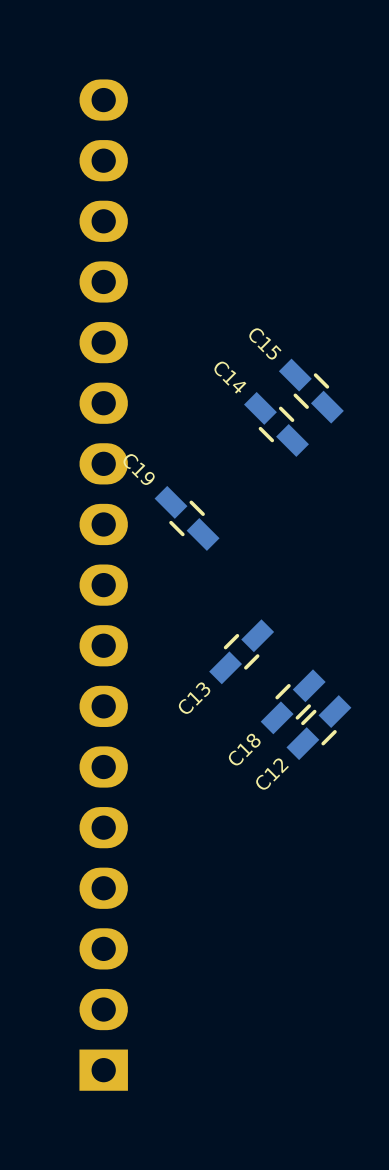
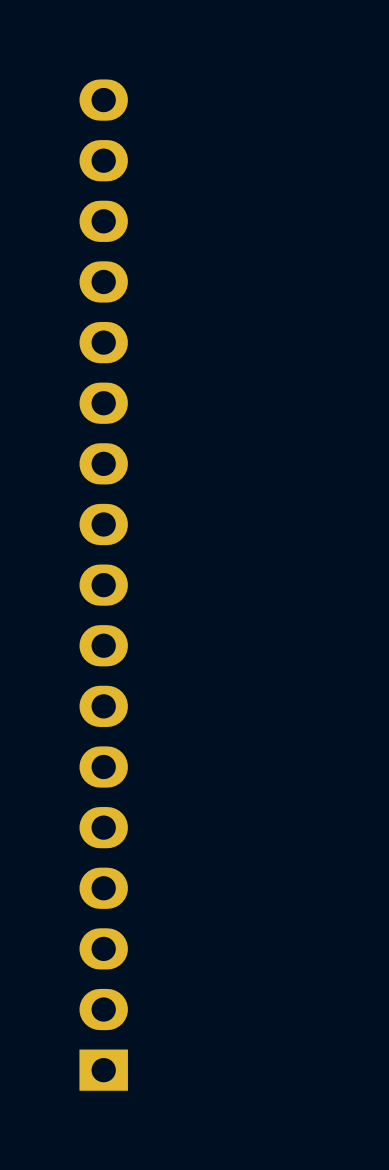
C15: (311, 391) -> none
C14: (276, 424) -> none
C19: (187, 518) -> none
C13: (241, 651) -> none
C18: (293, 701) -> none
C12: (318, 727) -> none

